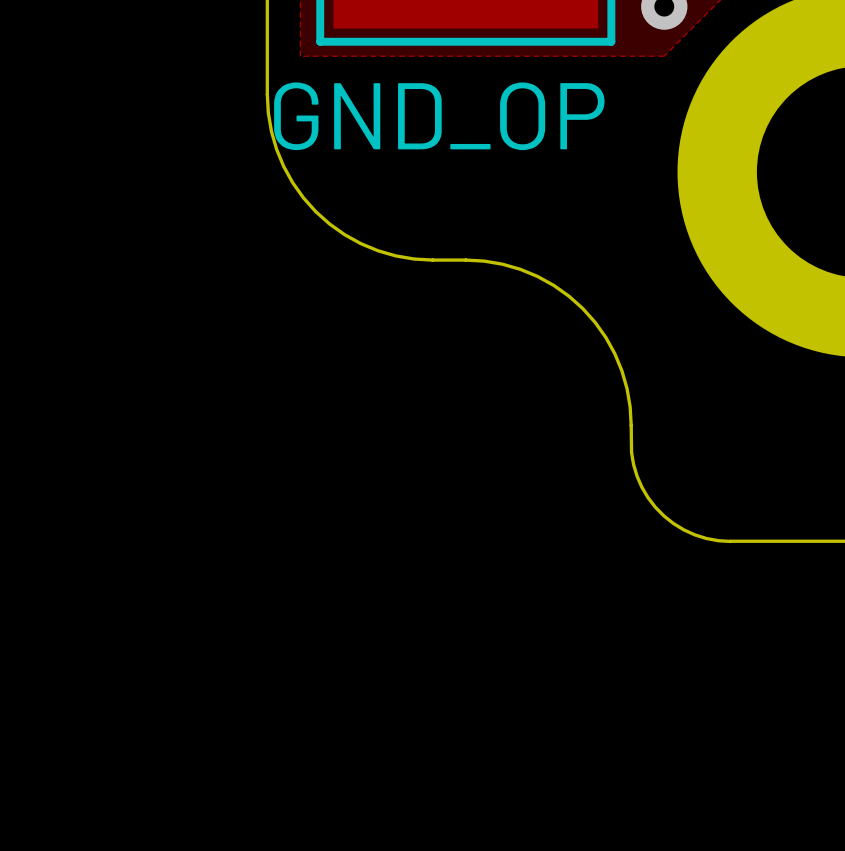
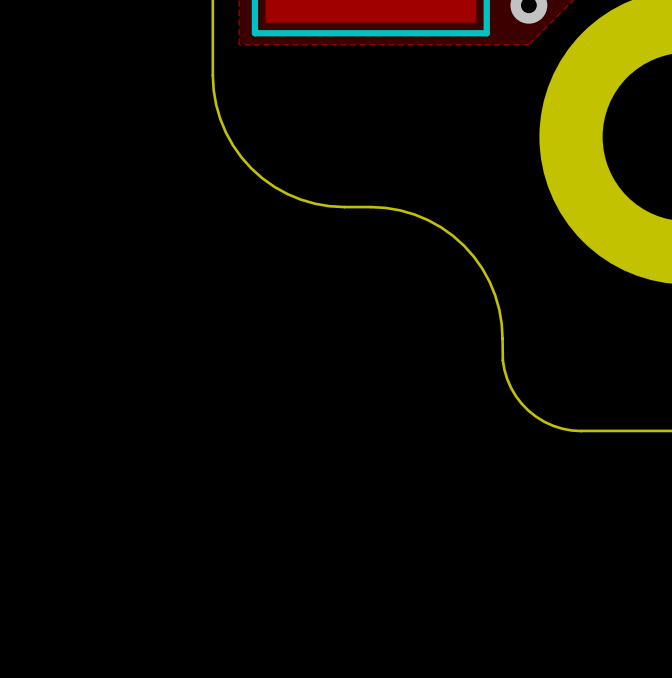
text: GND_OP (439, 116) -> none

